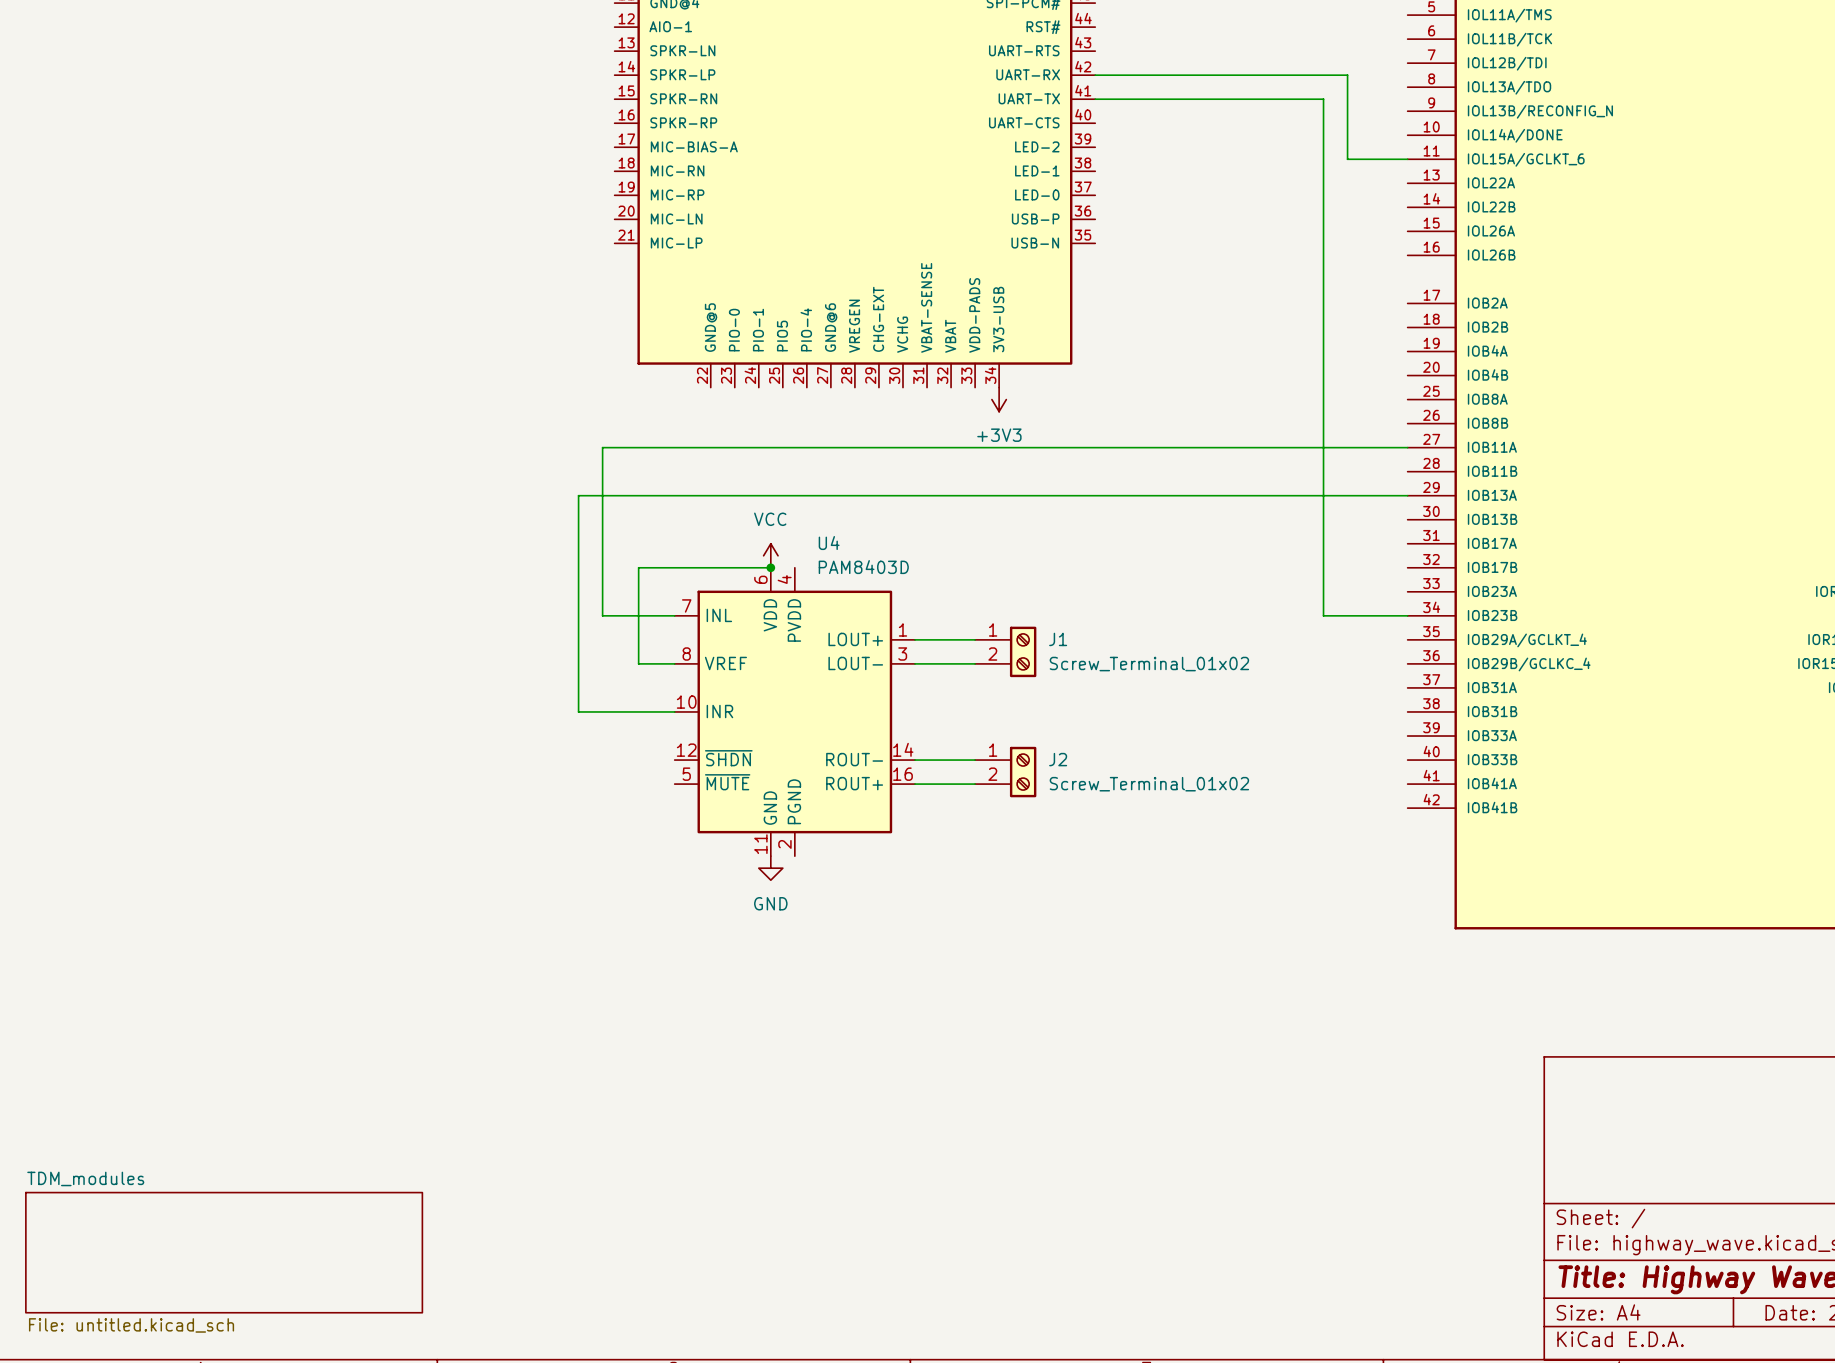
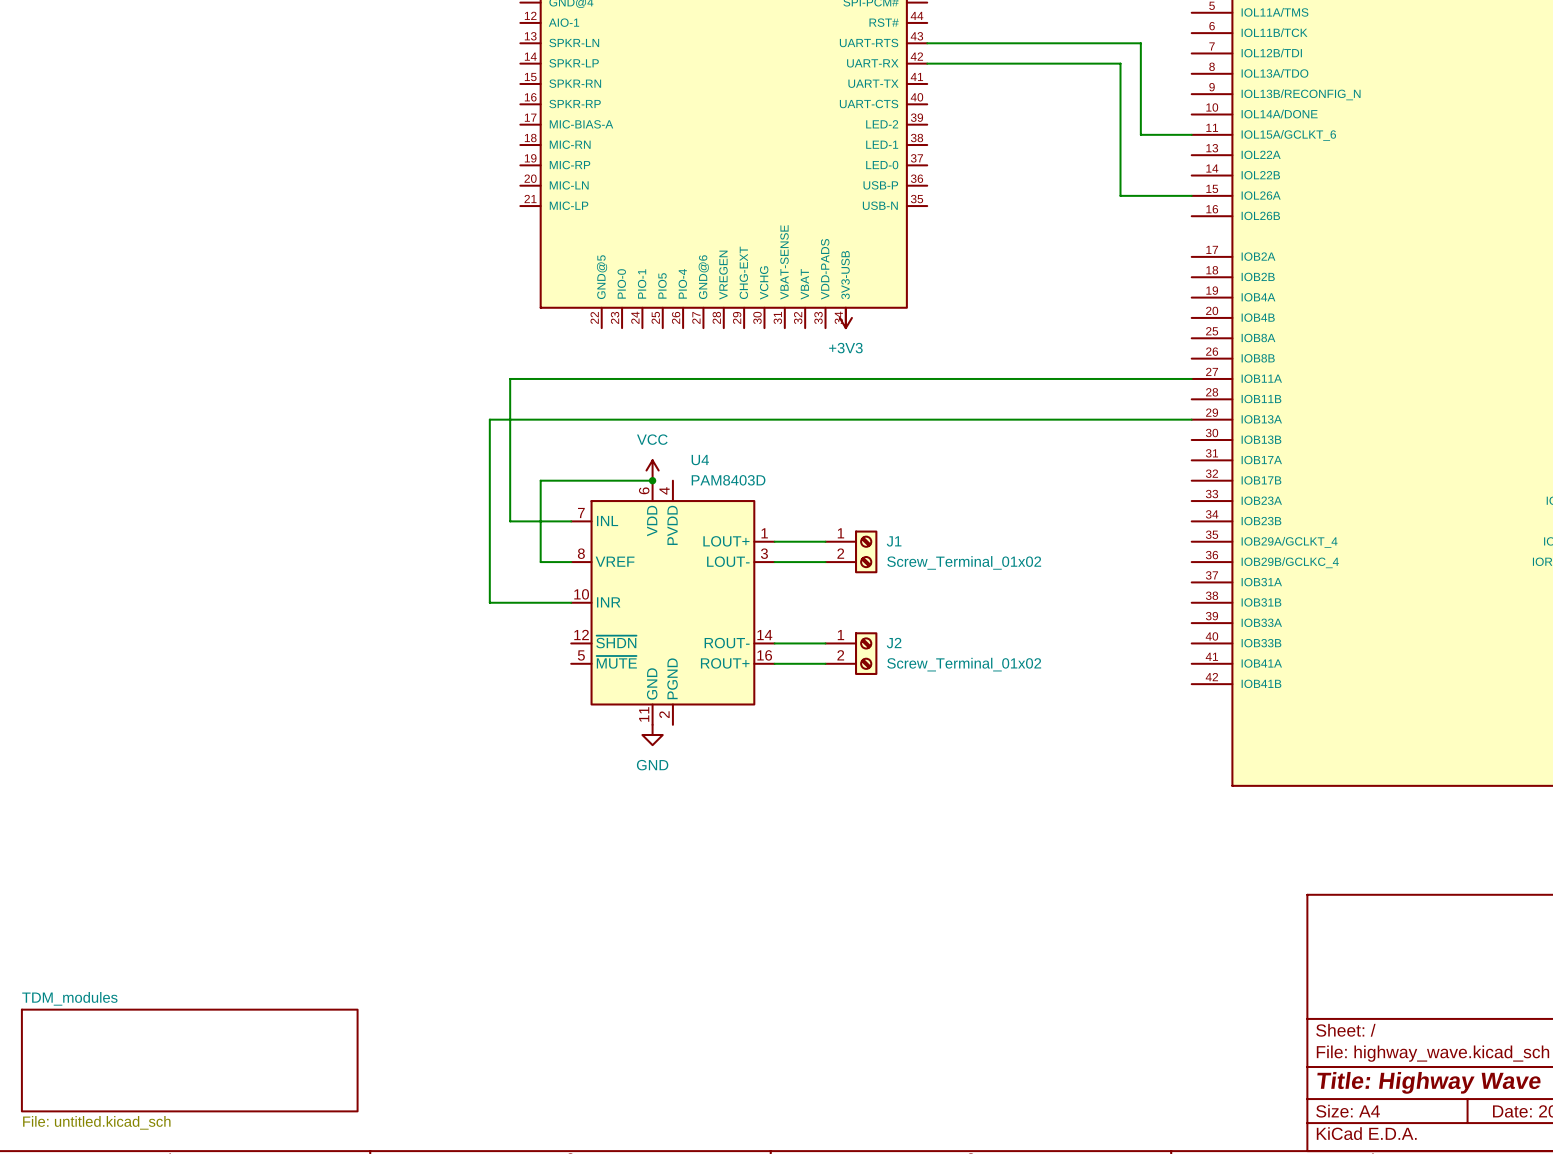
wire: none -> (927, 43) (1140, 43) (1140, 63)
wire: (1323, 75) (1347, 75) -> (1120, 63) (1120, 83)
wire: (1095, 99) (1323, 99) -> none
wire: (1323, 231) (1323, 615) (1407, 615) -> (1120, 195) (1191, 195)
power symbol position: +3V3 (999, 399) -> +3V3 (845, 317)

